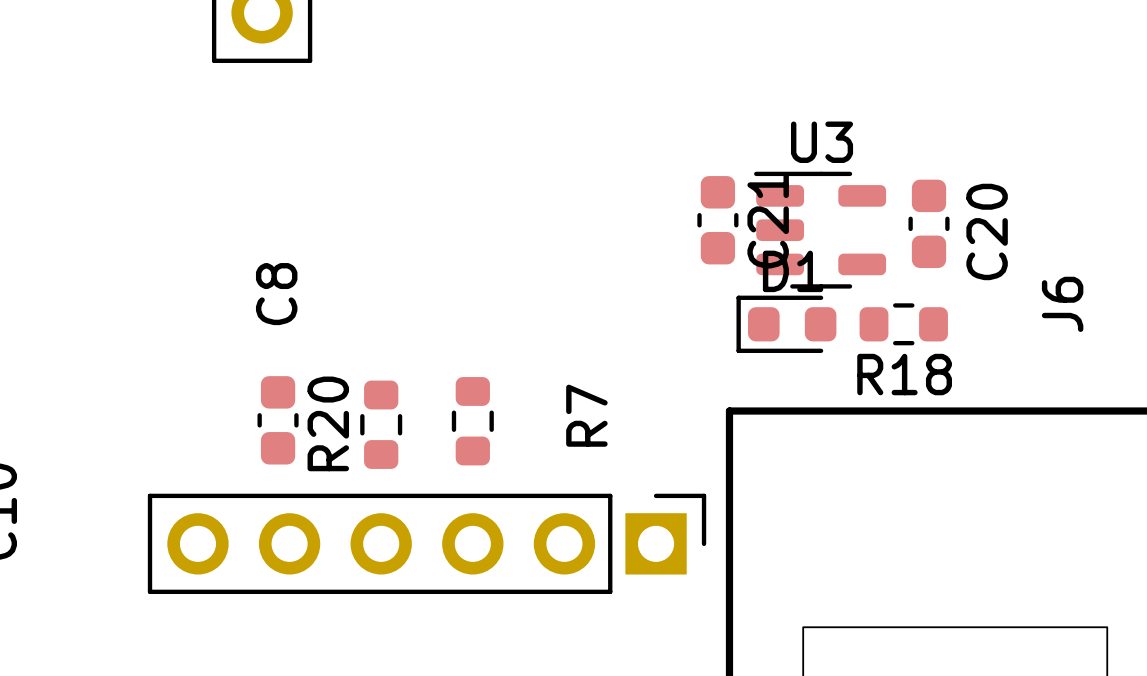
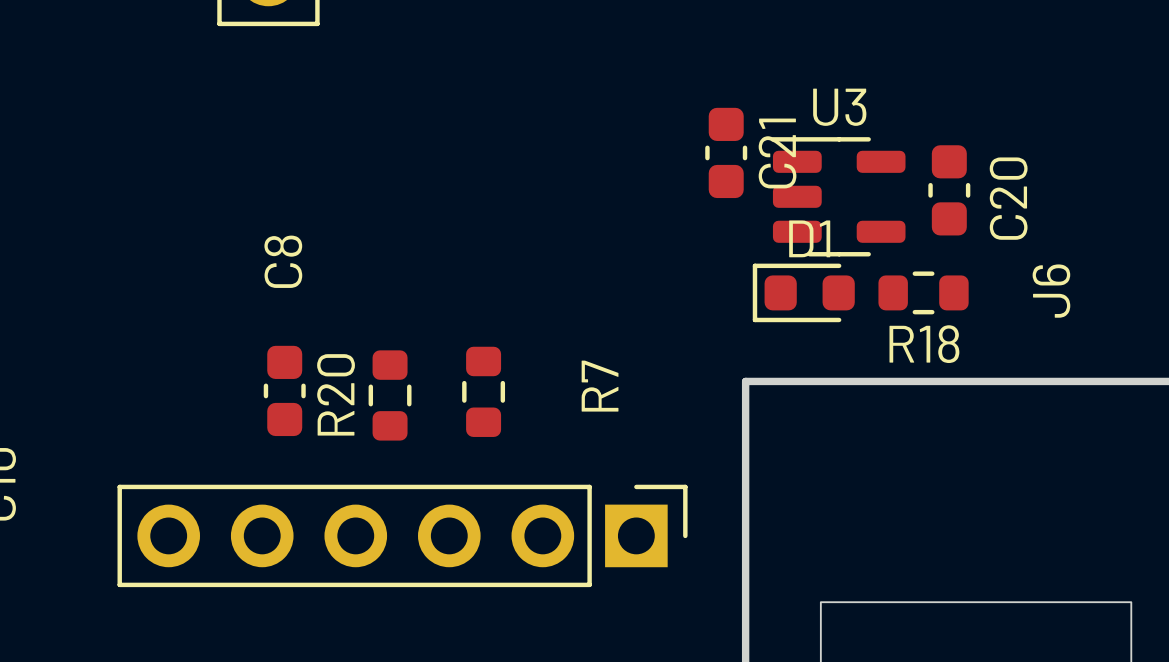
C21 position: (717, 220) -> (726, 152)
J6 position: (427, 543) -> (402, 535)

